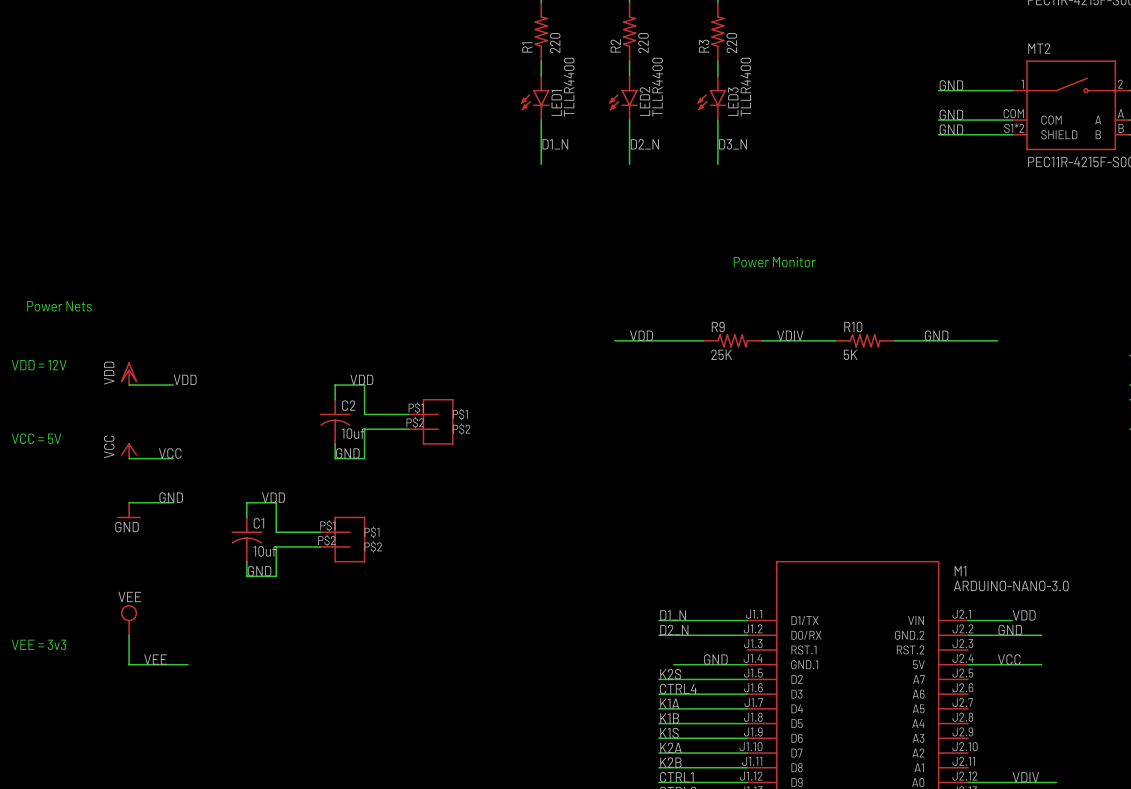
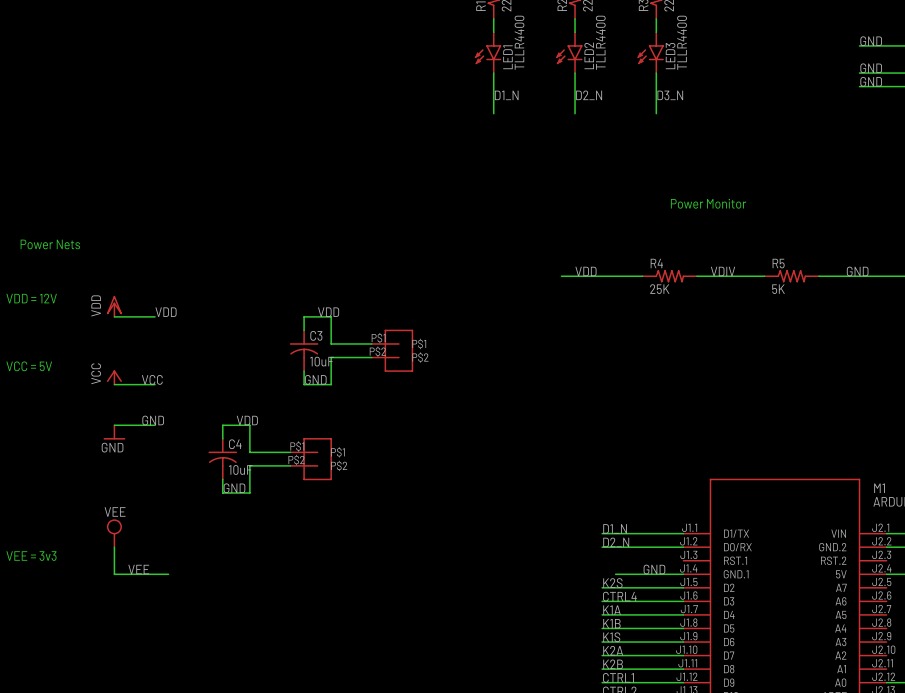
R9 name: R9 (718, 327) -> R4 (656, 263)
R10 name: R10 (853, 327) -> R5 (778, 263)
C2 name: C2 (348, 405) -> C3 (316, 335)
C2 value: 10uf (353, 433) -> 10uF (322, 361)
C1 name: C1 (258, 523) -> C4 (235, 444)
C1 value: 10uf (264, 551) -> 10uF (240, 469)

